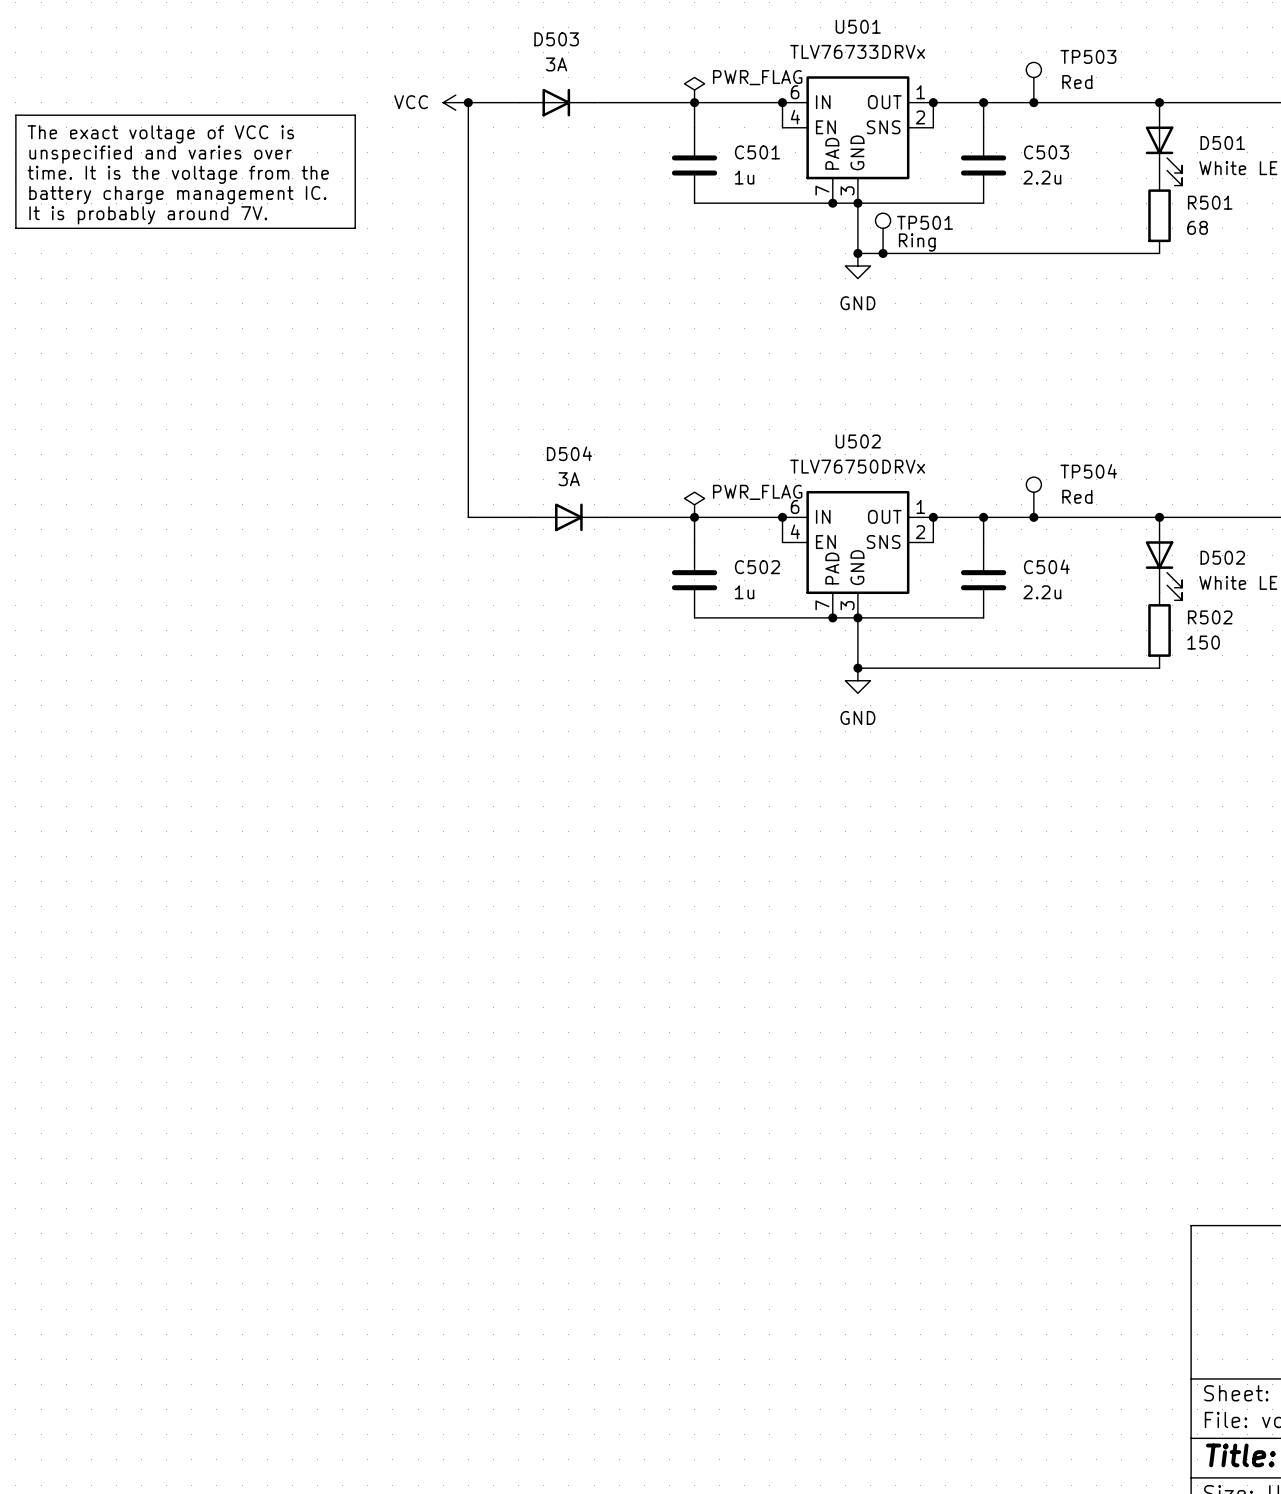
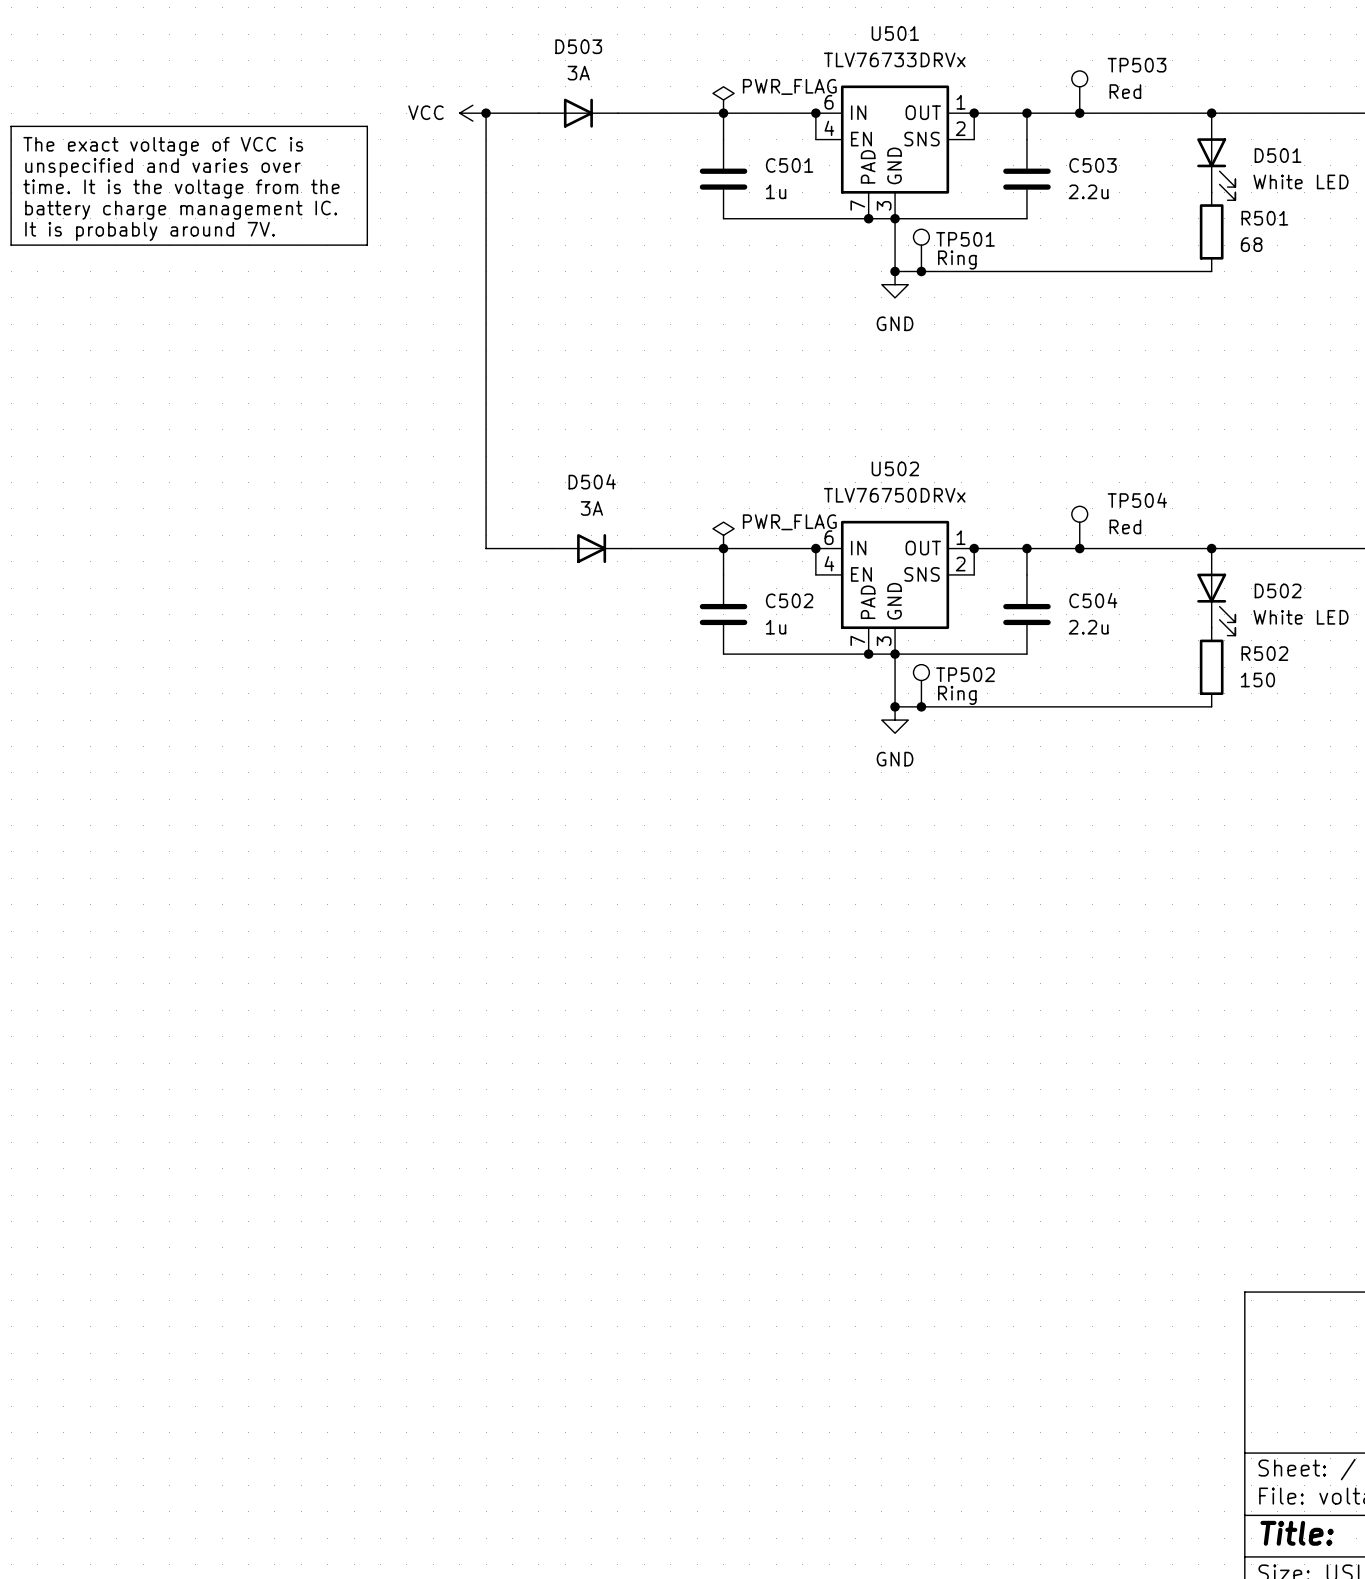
TP502: none -> Ring (921, 685)
junction: none -> (921, 706)

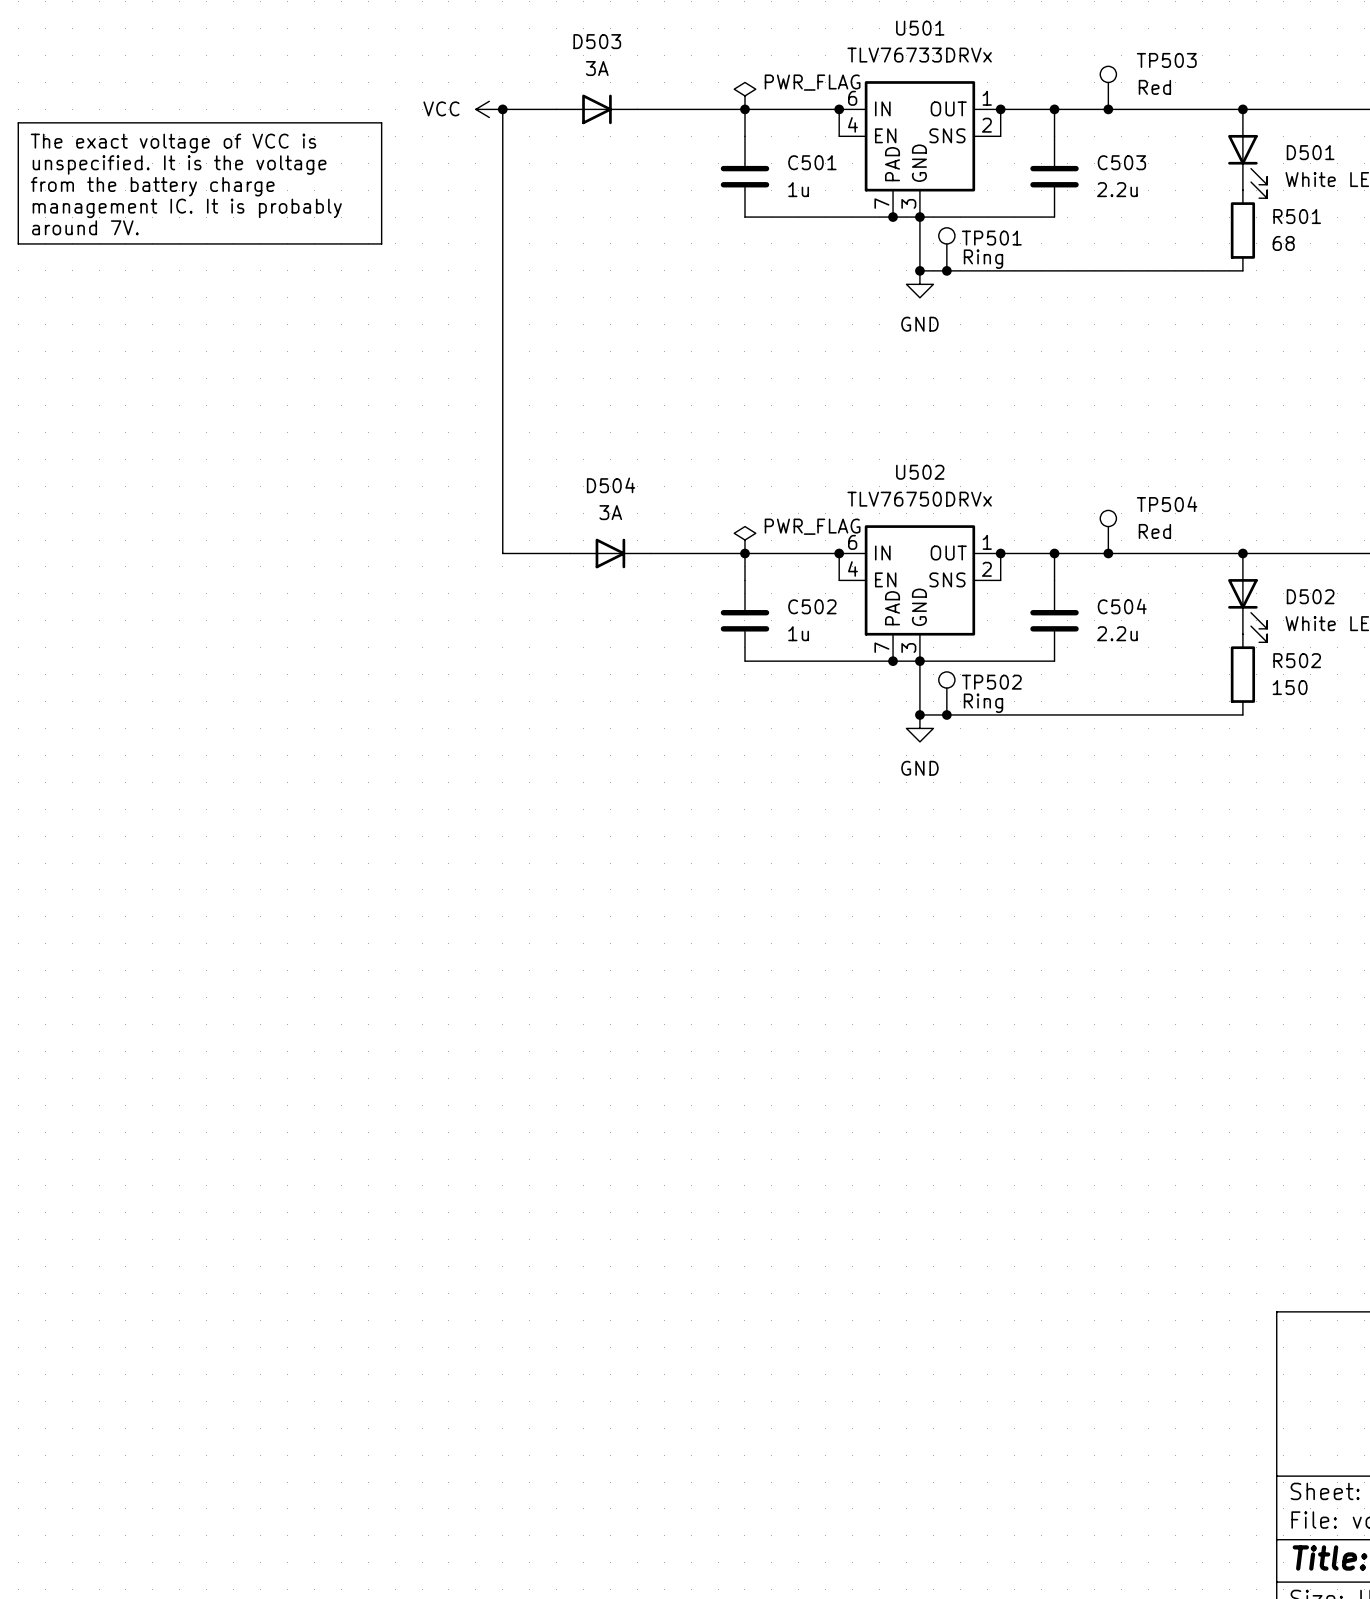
text: unspecified and varies over (162, 167) -> unspecified. It is the voltage (179, 165)
text: time. It is the voltage from the (181, 188) -> from the battery charge (152, 186)
text: battery charge management IC. (181, 210) -> management IC. It is probably (187, 208)
text: It is probably around 7V. (150, 231) -> around 7V. (85, 227)

